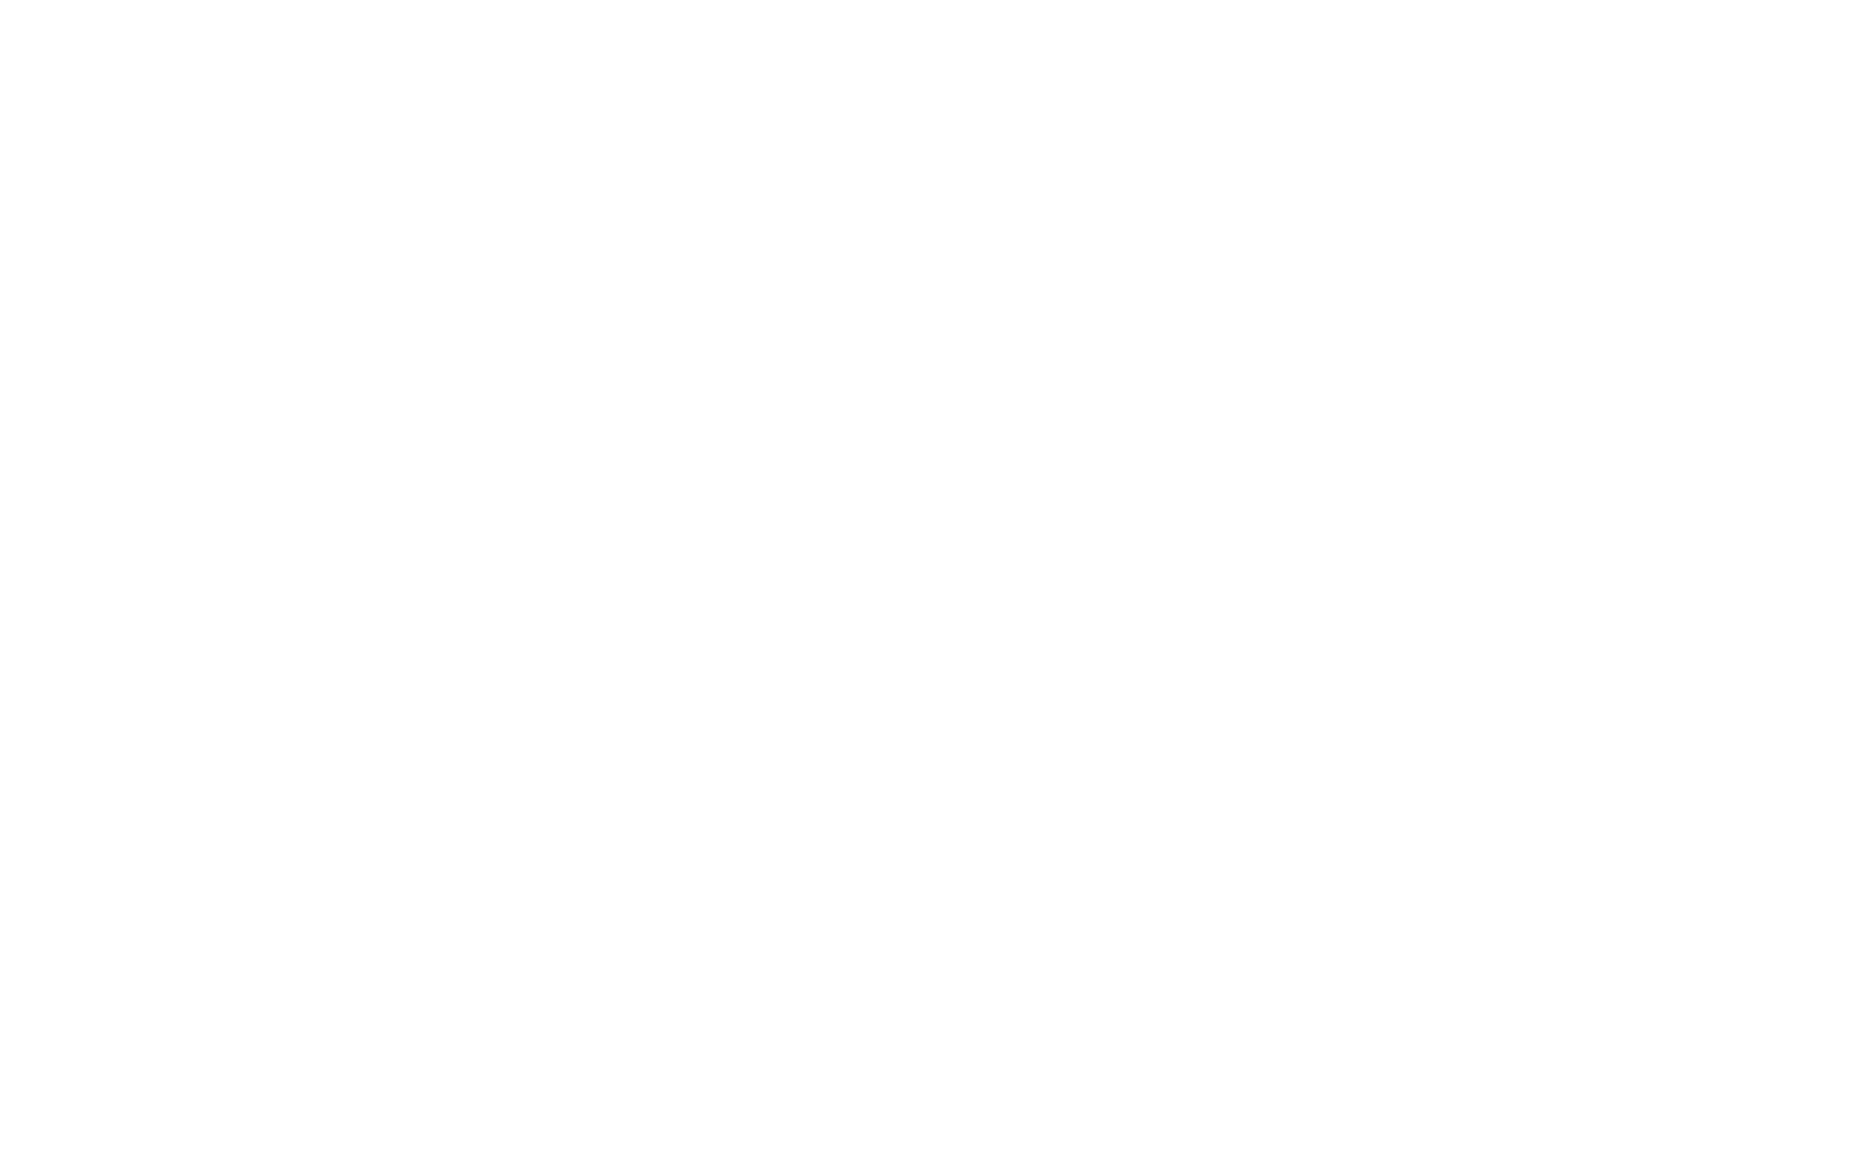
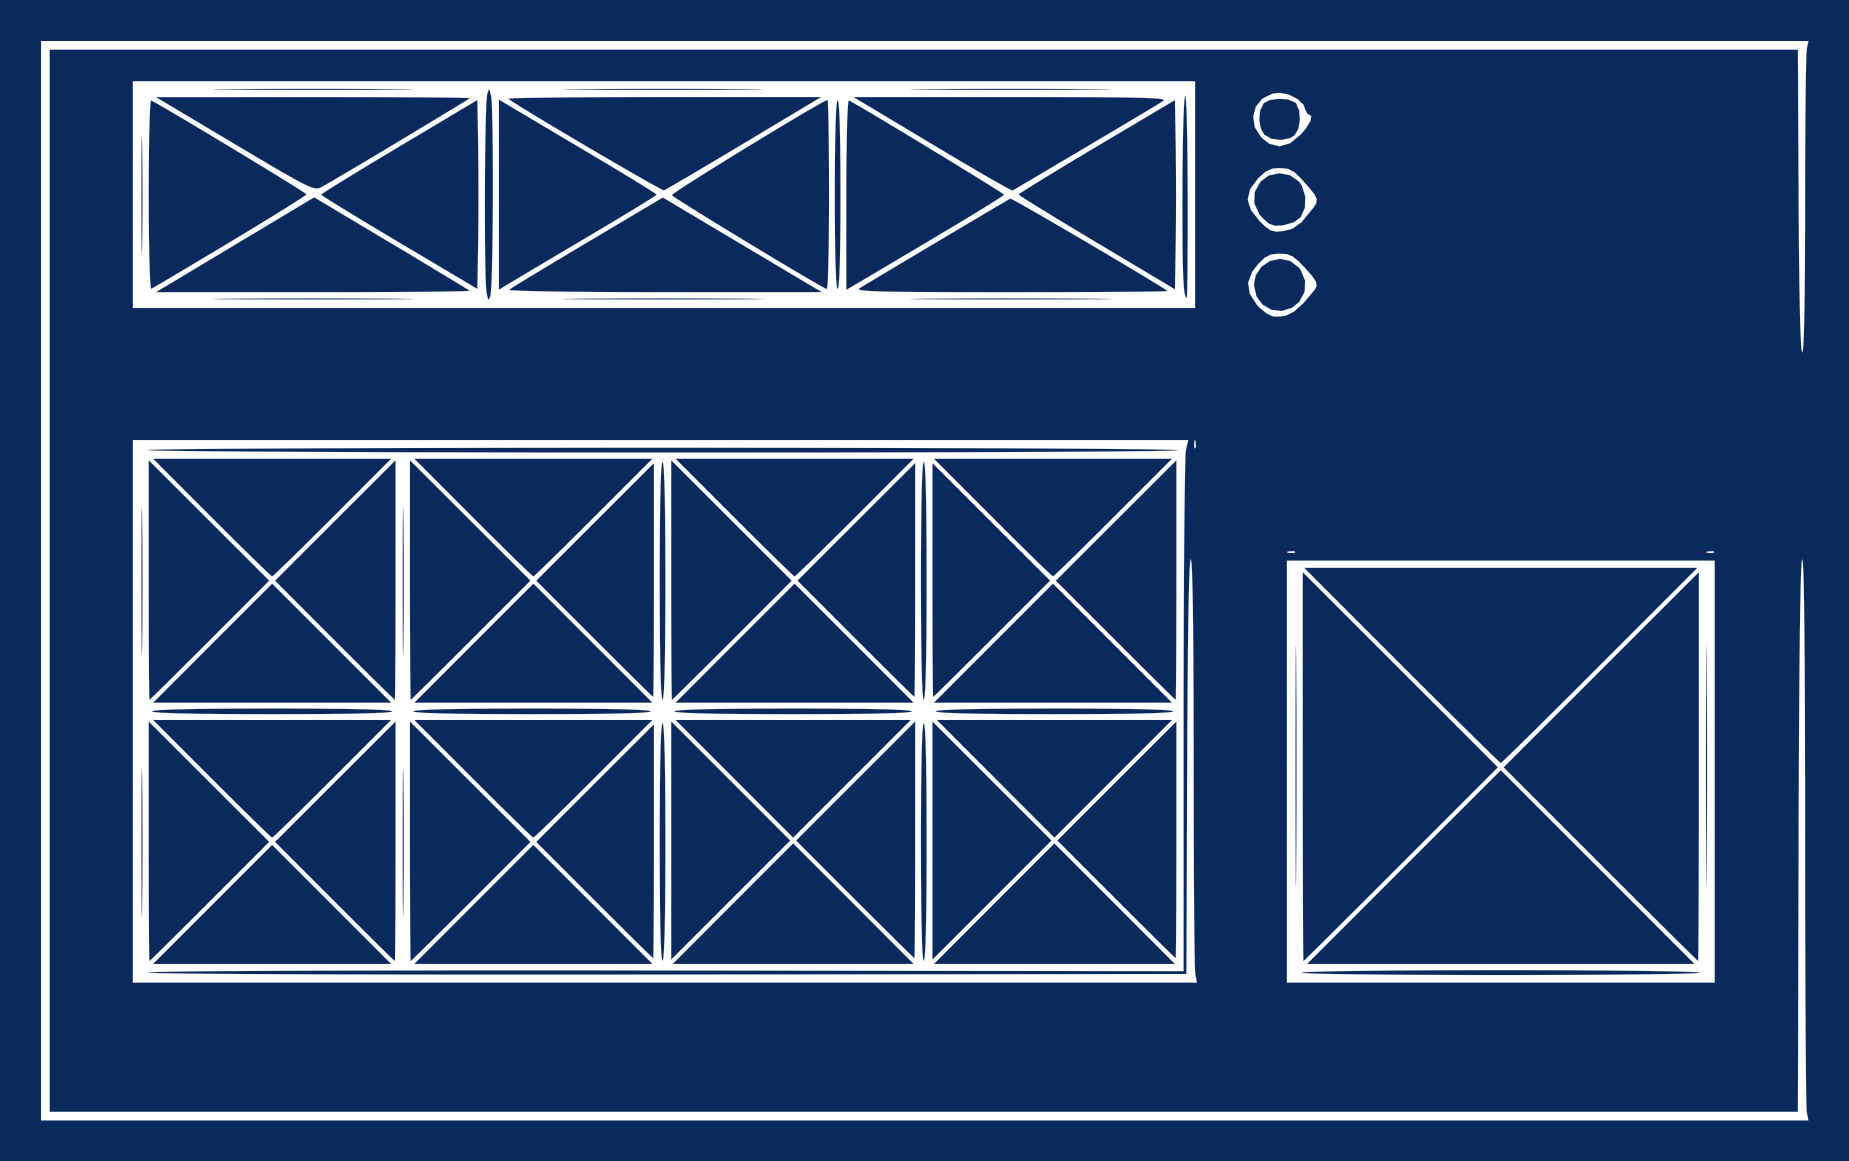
drawing: none -> [40, 40, 1809, 1121]

